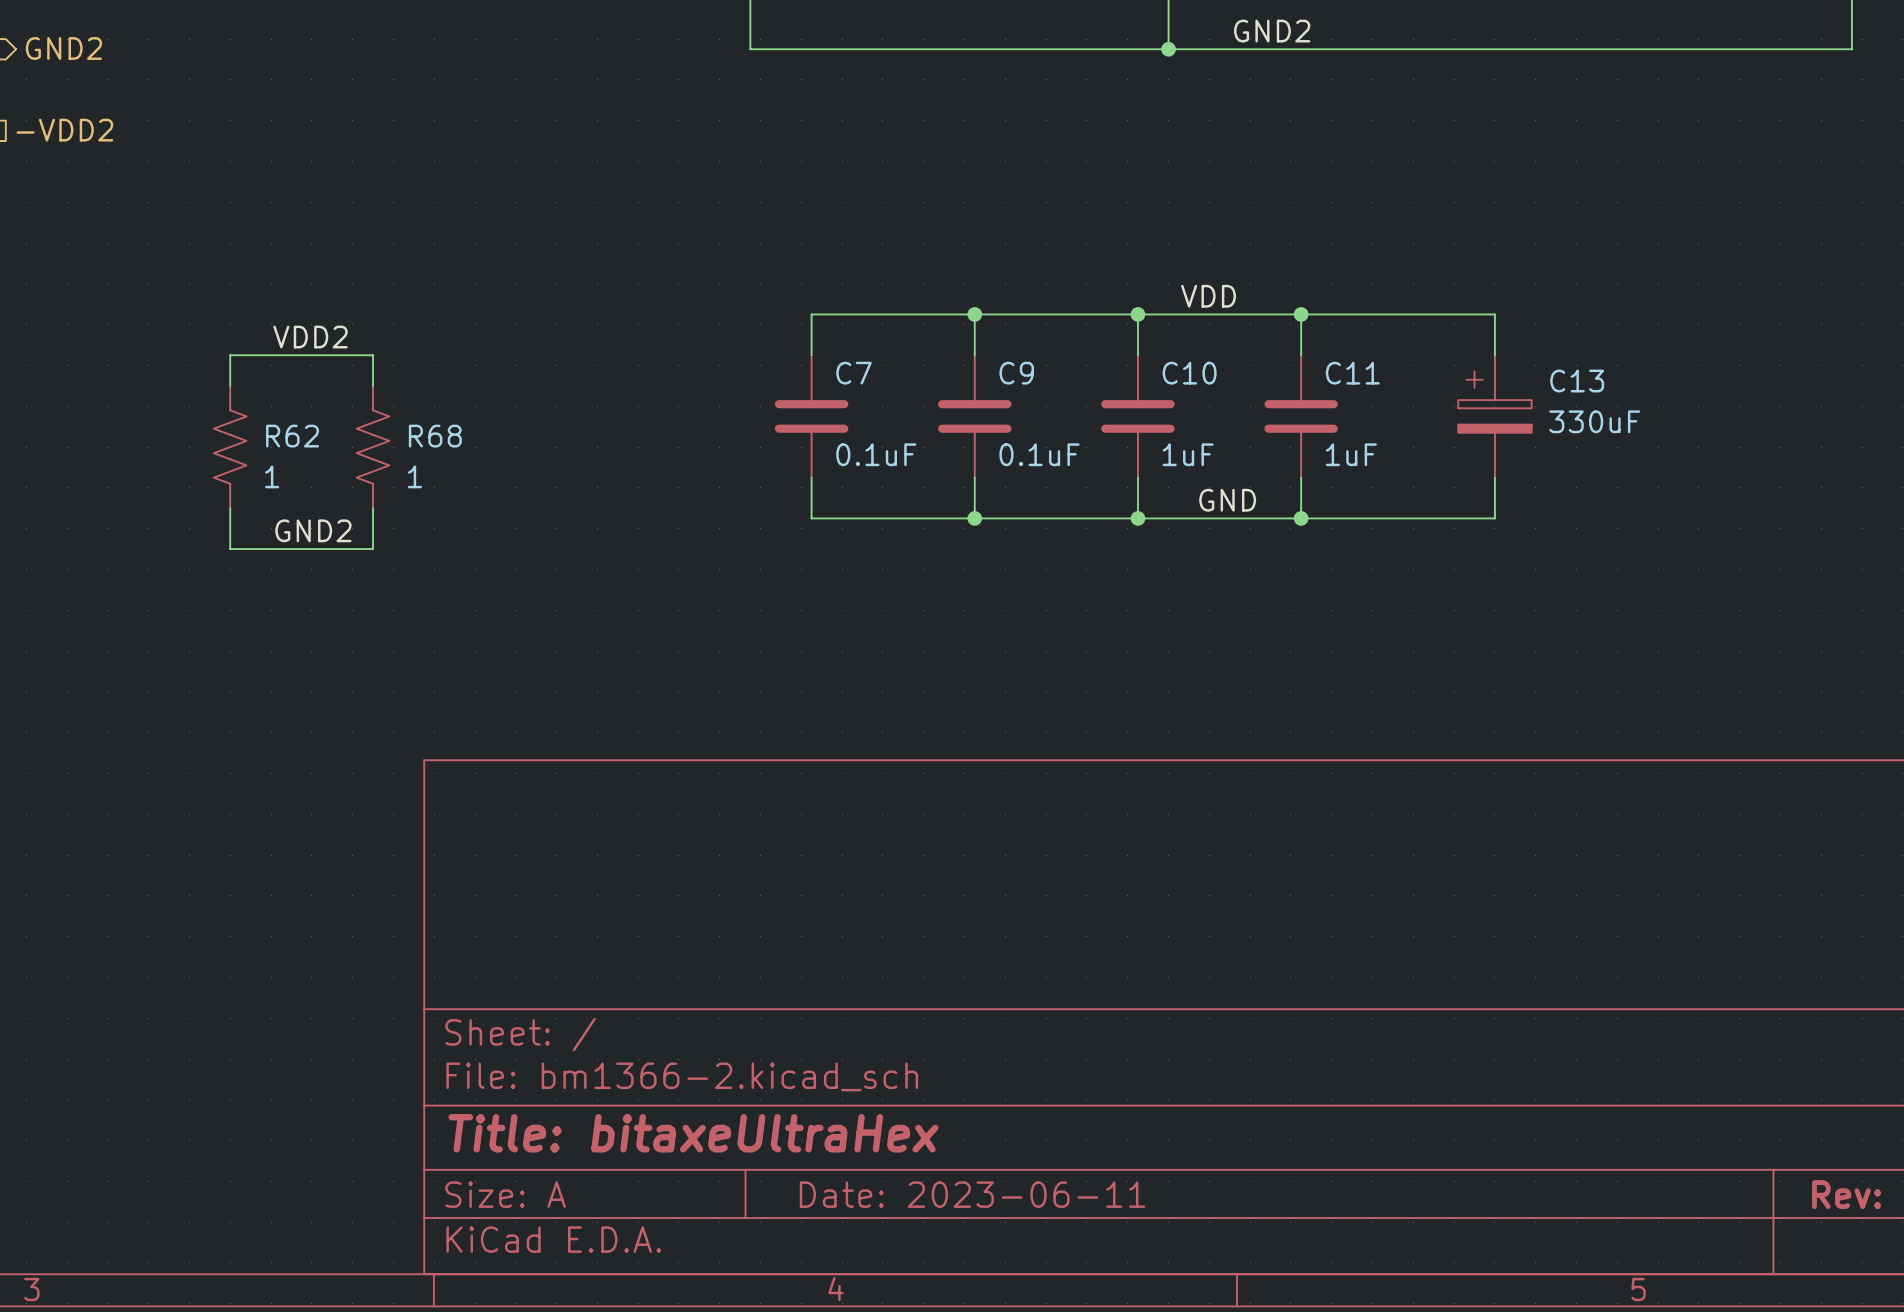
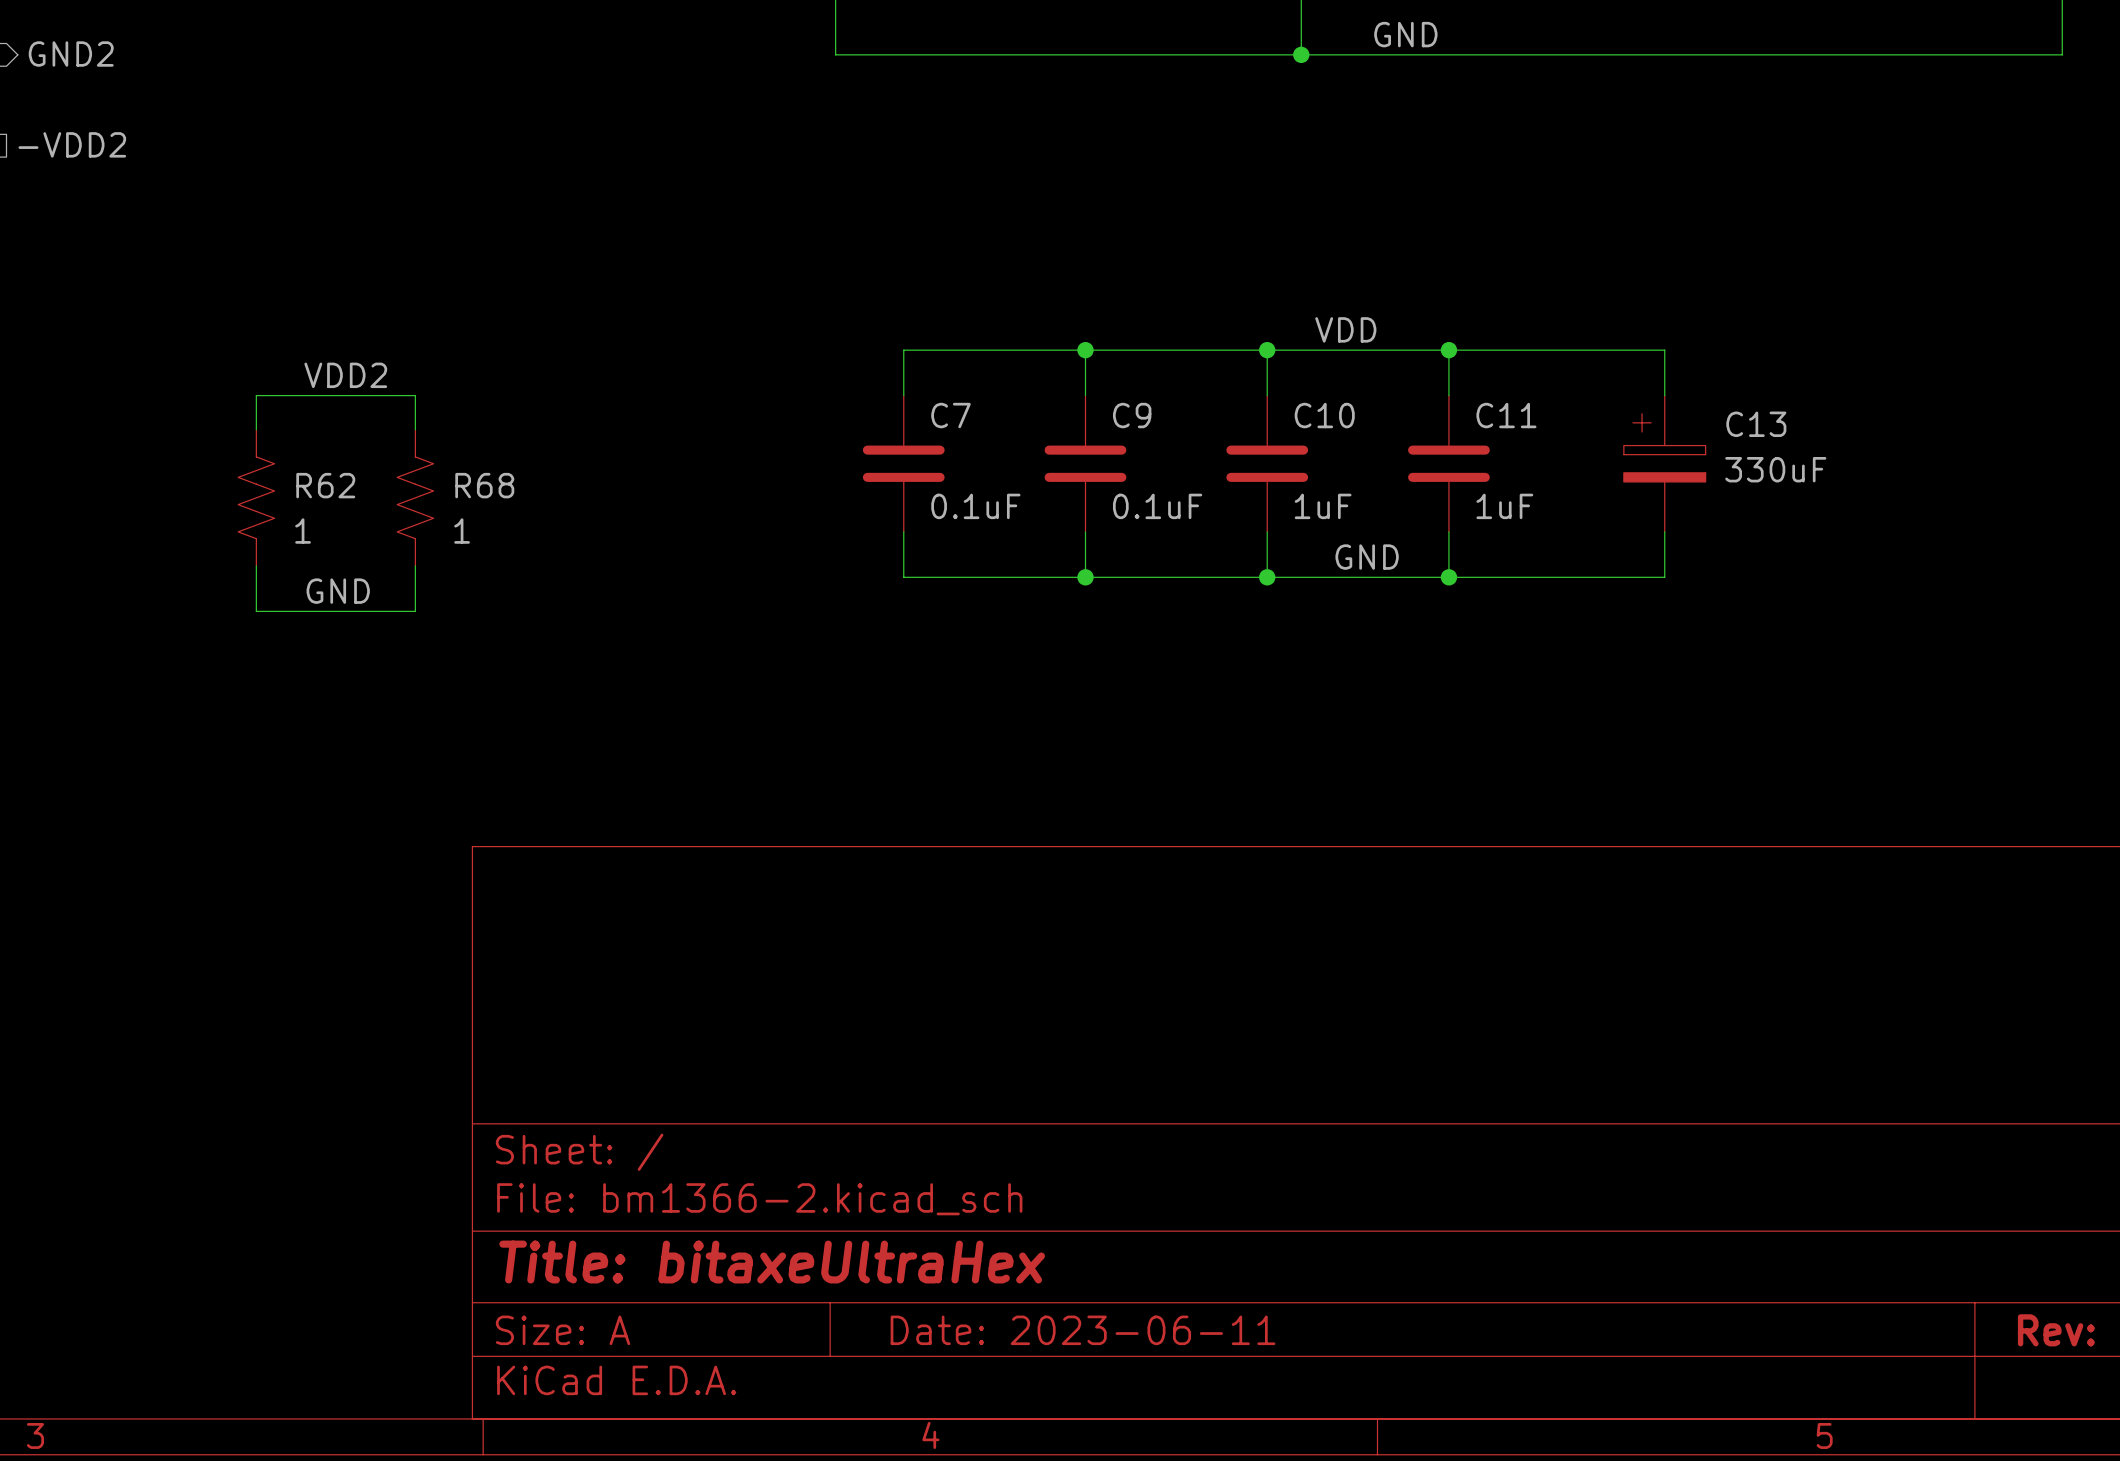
label: GND2 (1272, 31) -> GND (1405, 34)
label: GND2 (313, 530) -> GND (338, 591)

